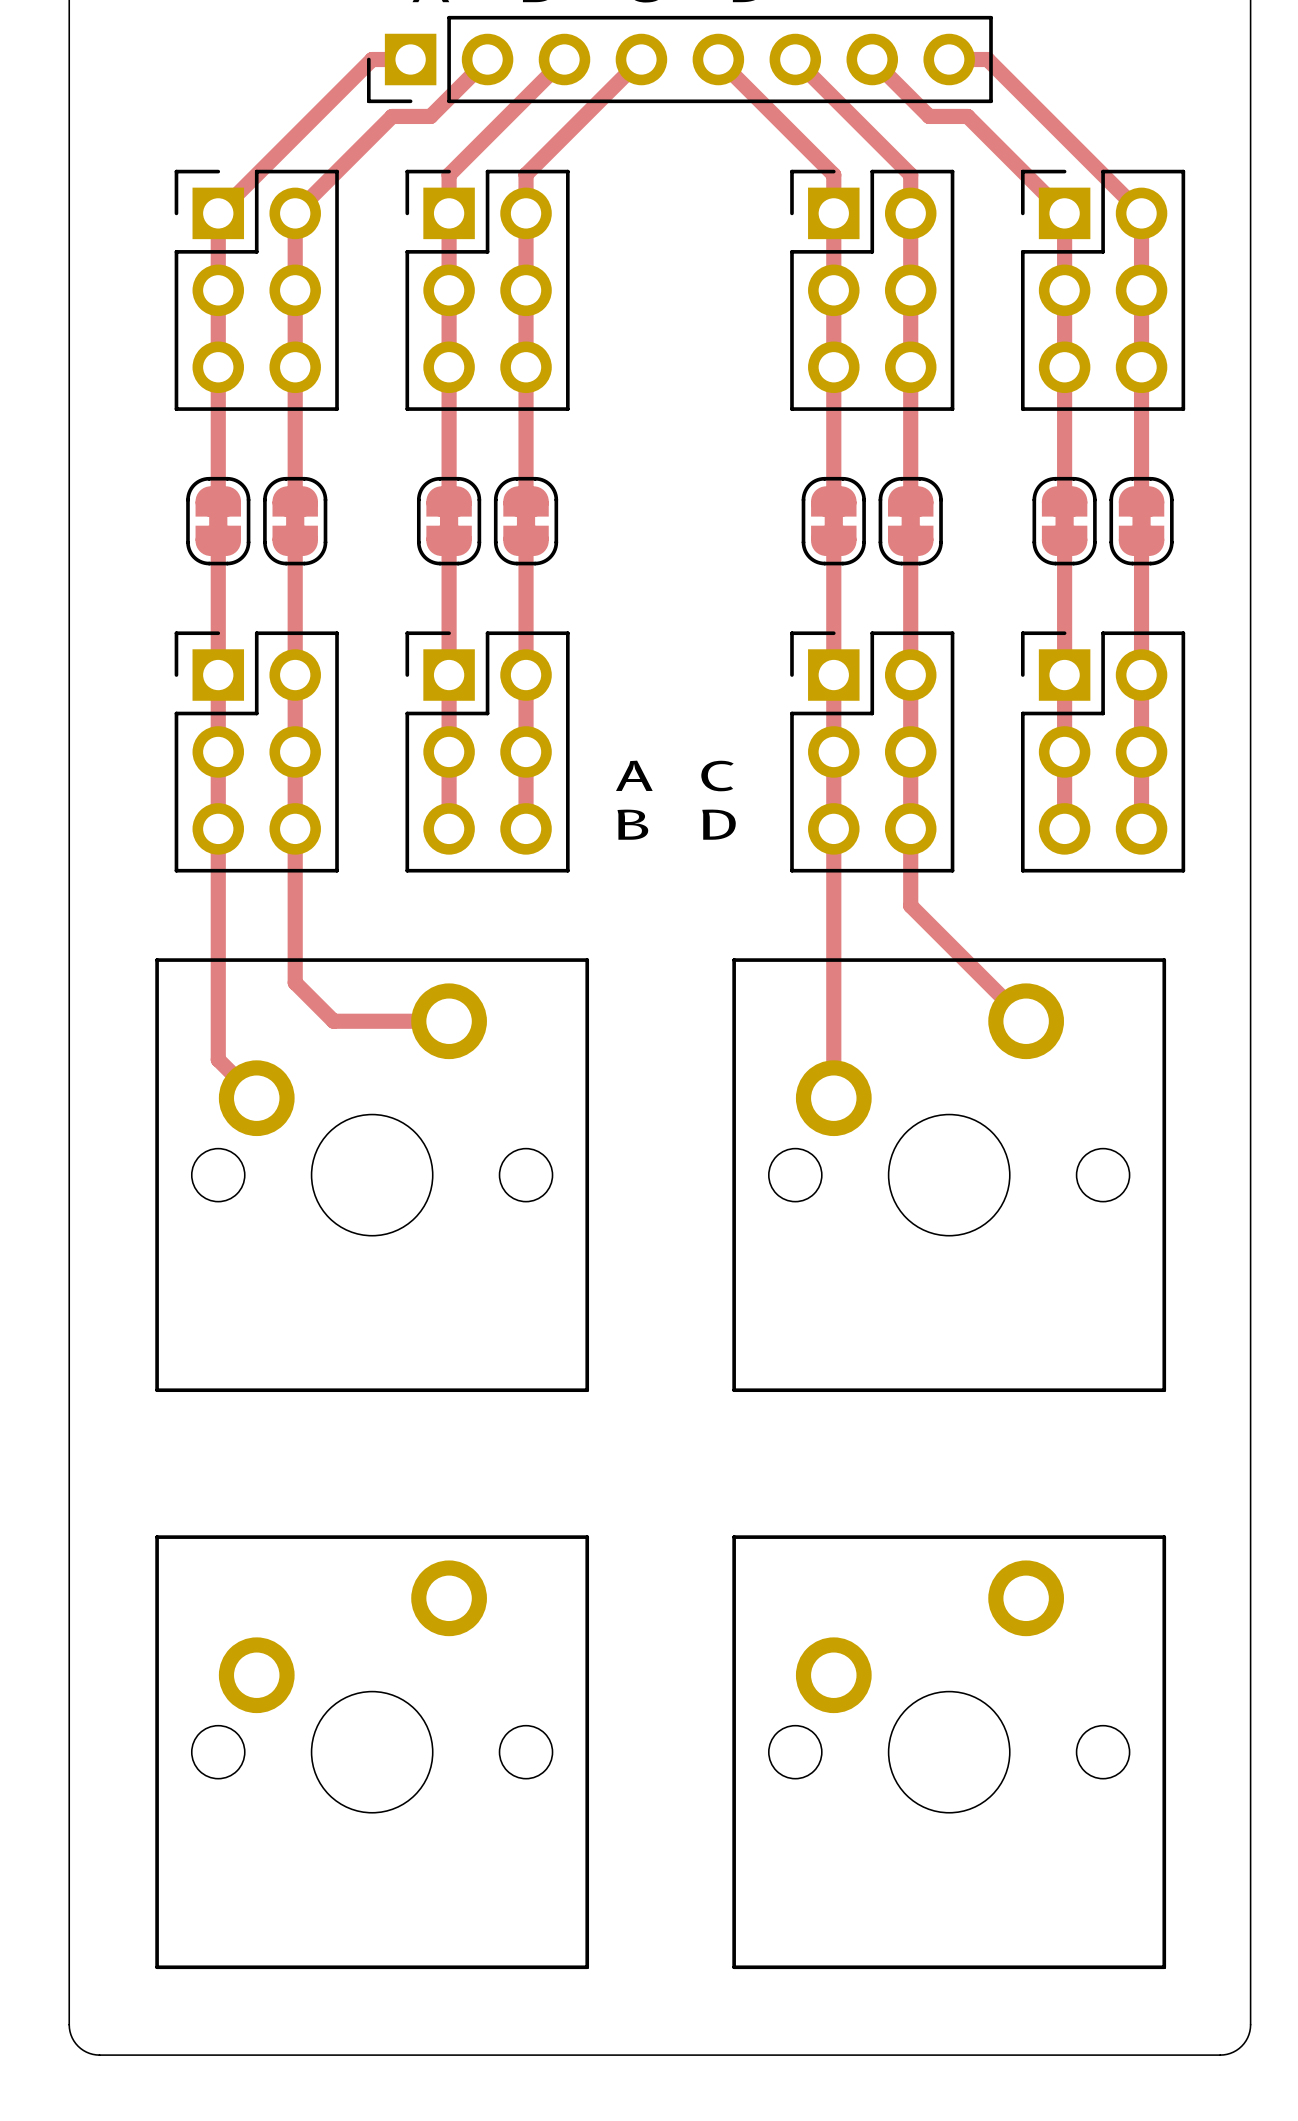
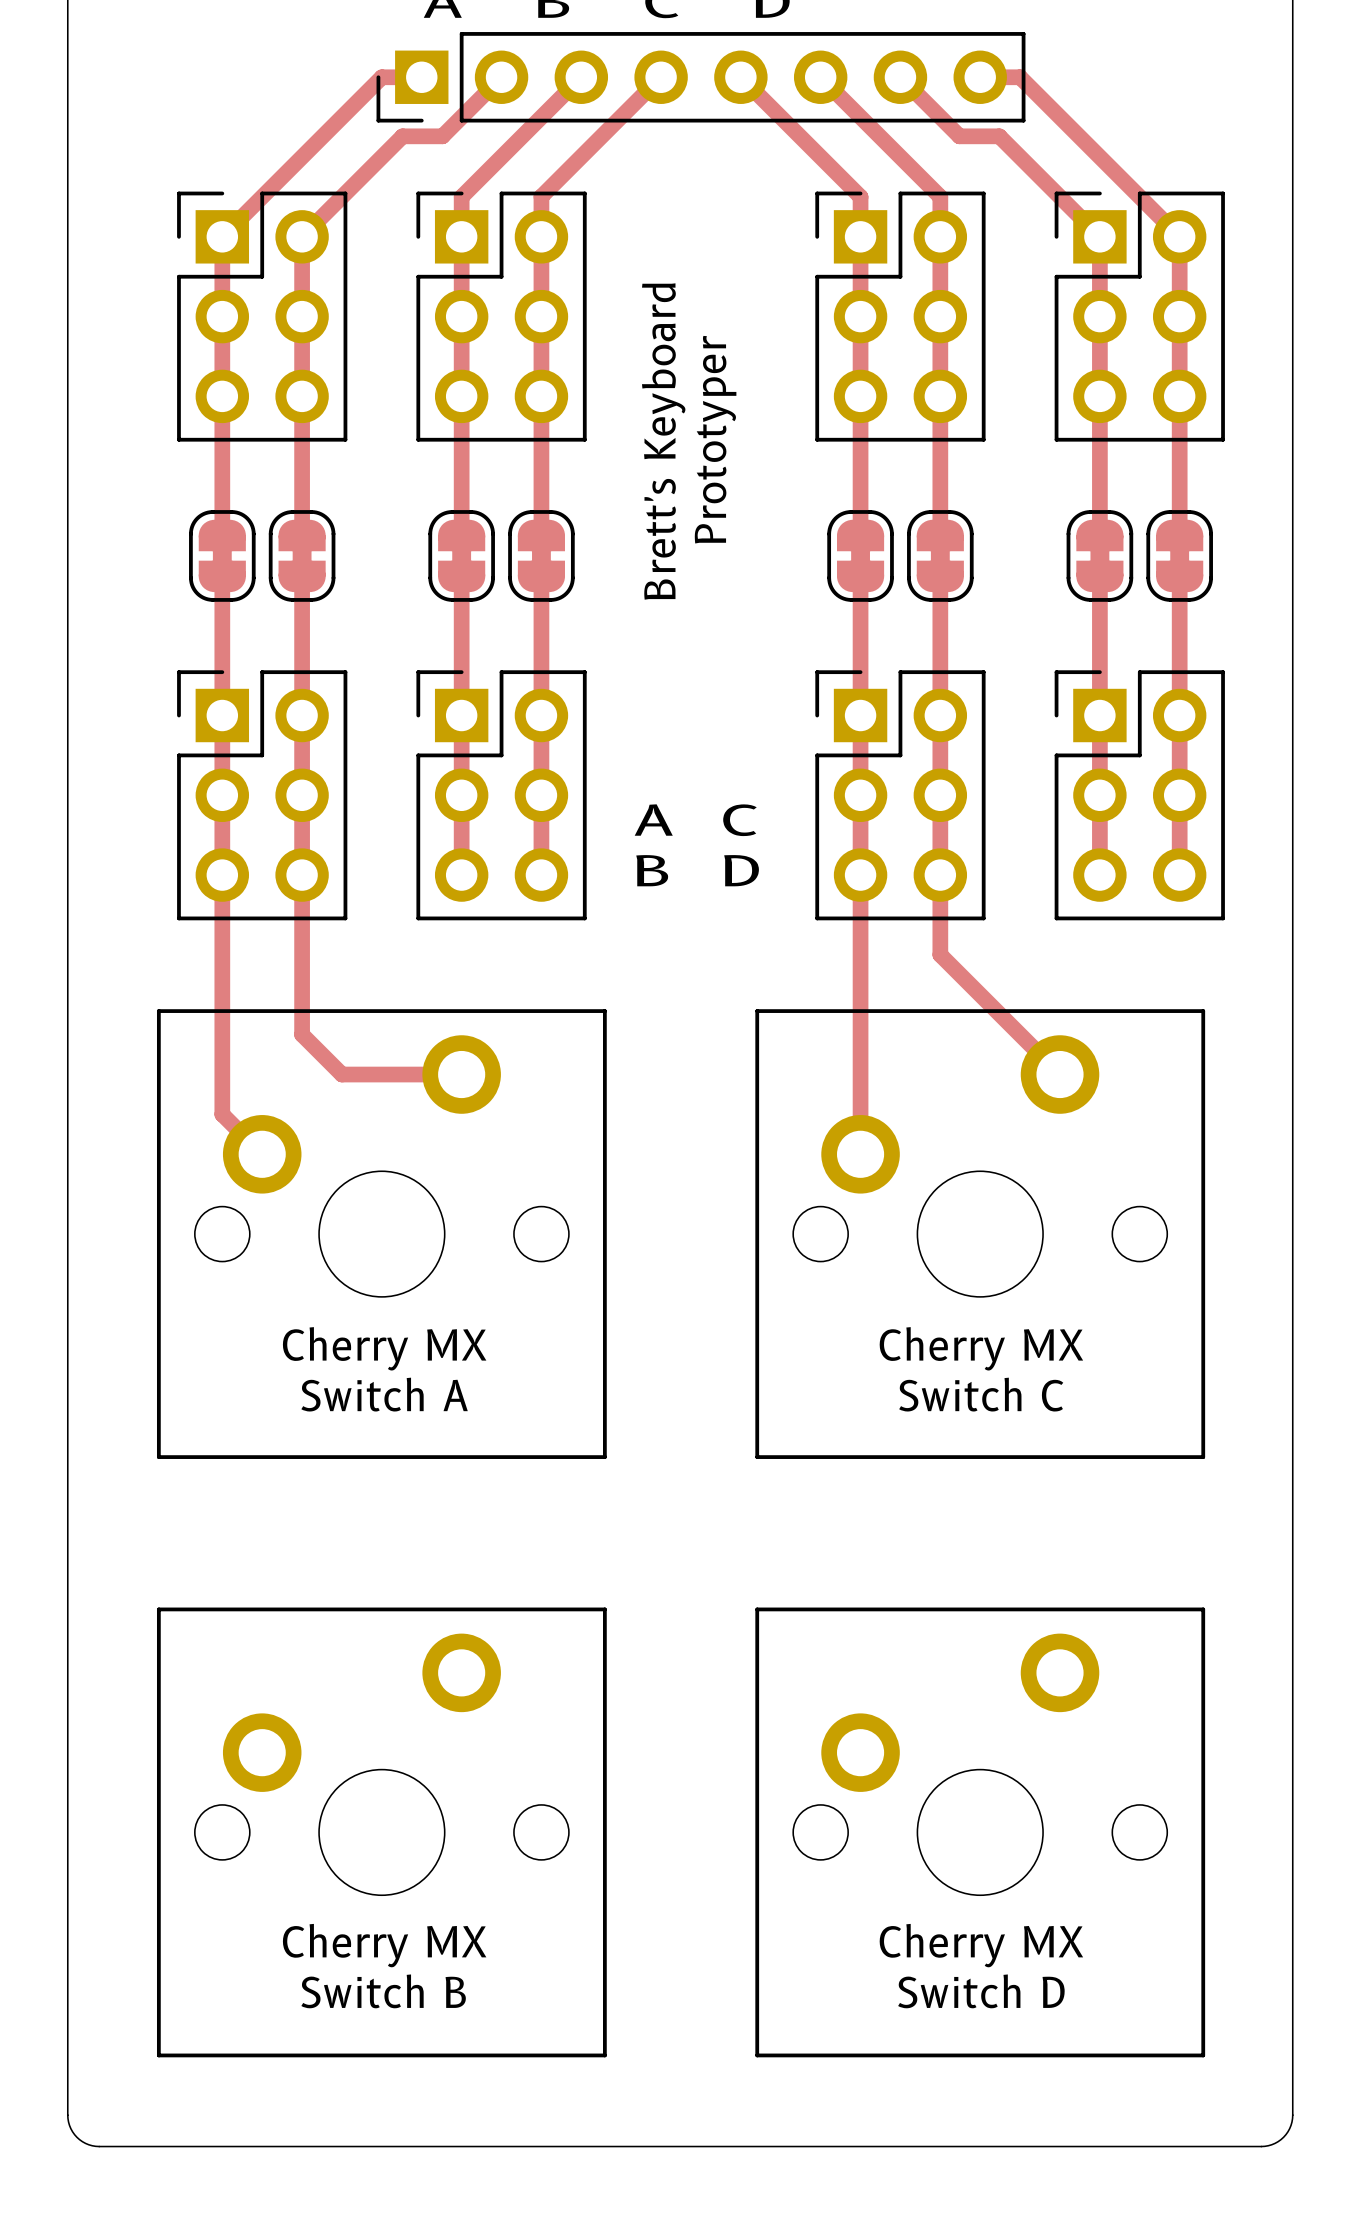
text: none -> Prototyper (715, 439)
text: none -> Brett's Keyboard (663, 441)
text: none -> Cherry MX (384, 1348)
text: none -> Cherry MX (981, 1348)
text: none -> Switch A (384, 1394)
text: none -> Switch C (981, 1394)
text: none -> Cherry MX (384, 1945)
text: none -> Cherry MX (981, 1945)
text: none -> Switch B (383, 1991)
text: none -> Switch D (981, 1991)

